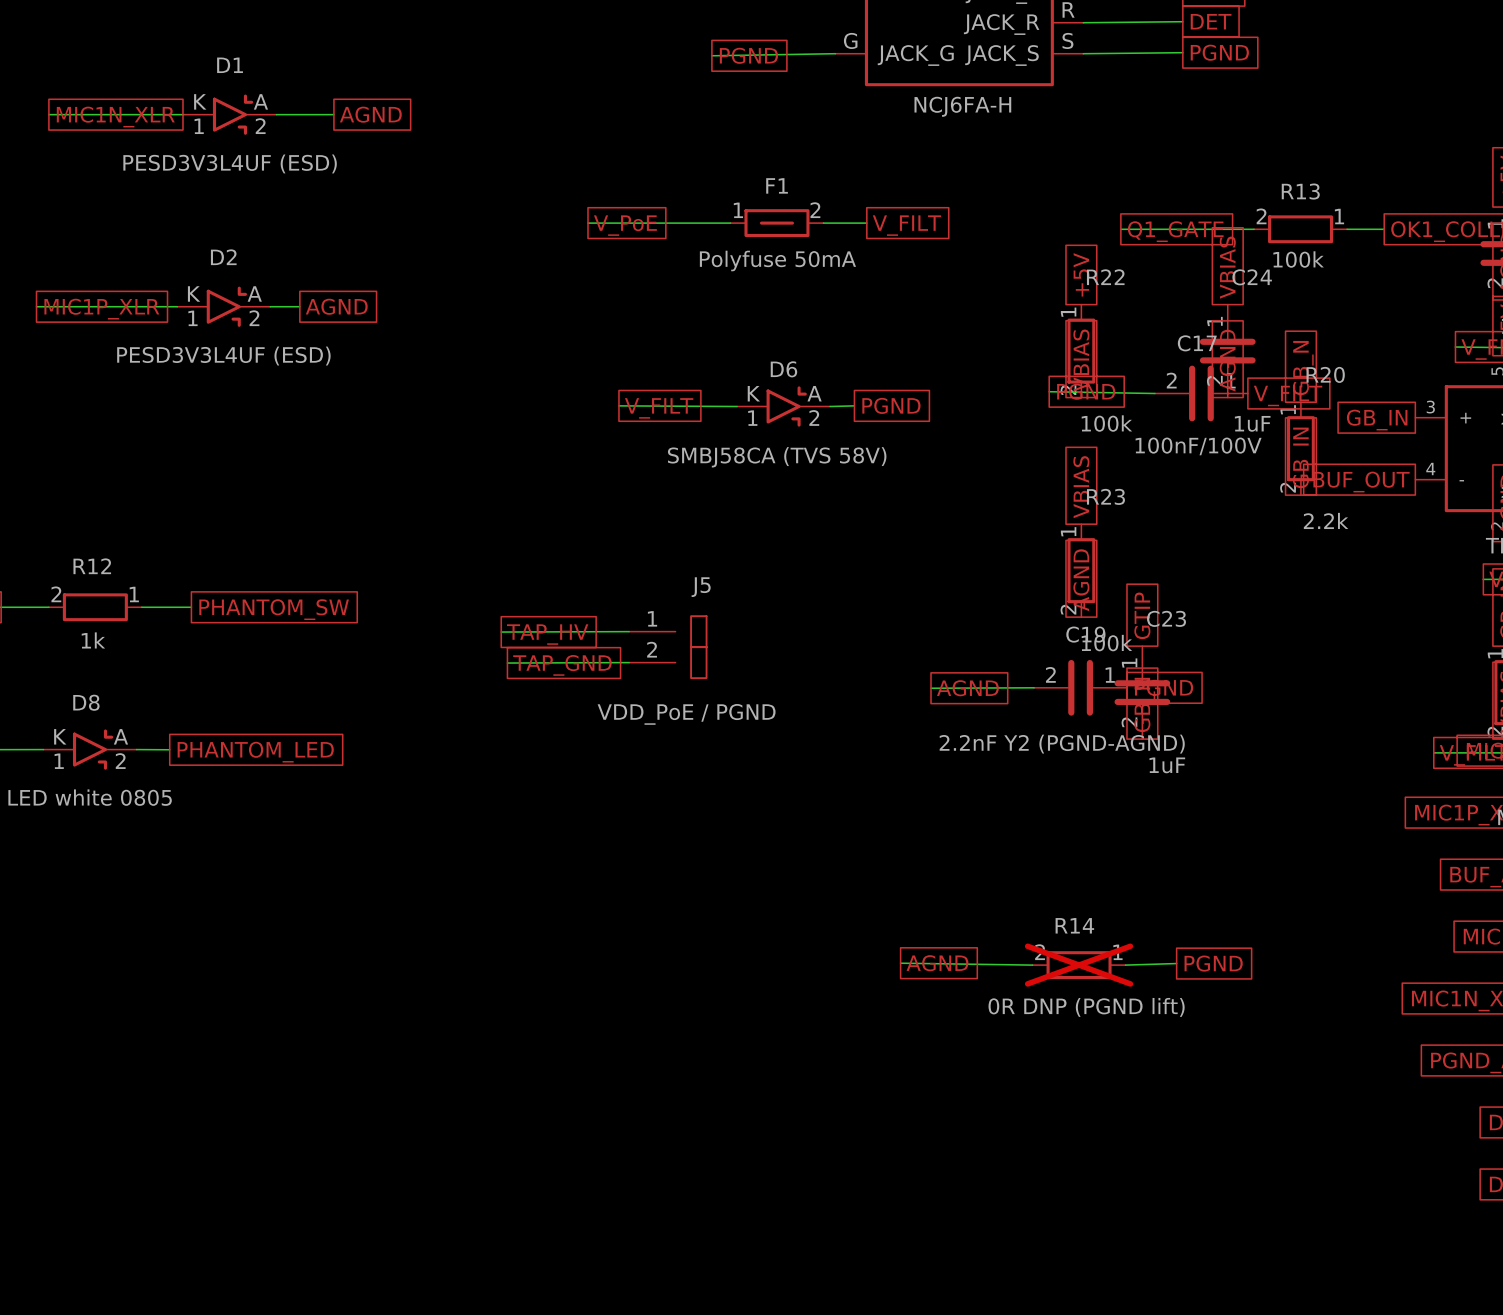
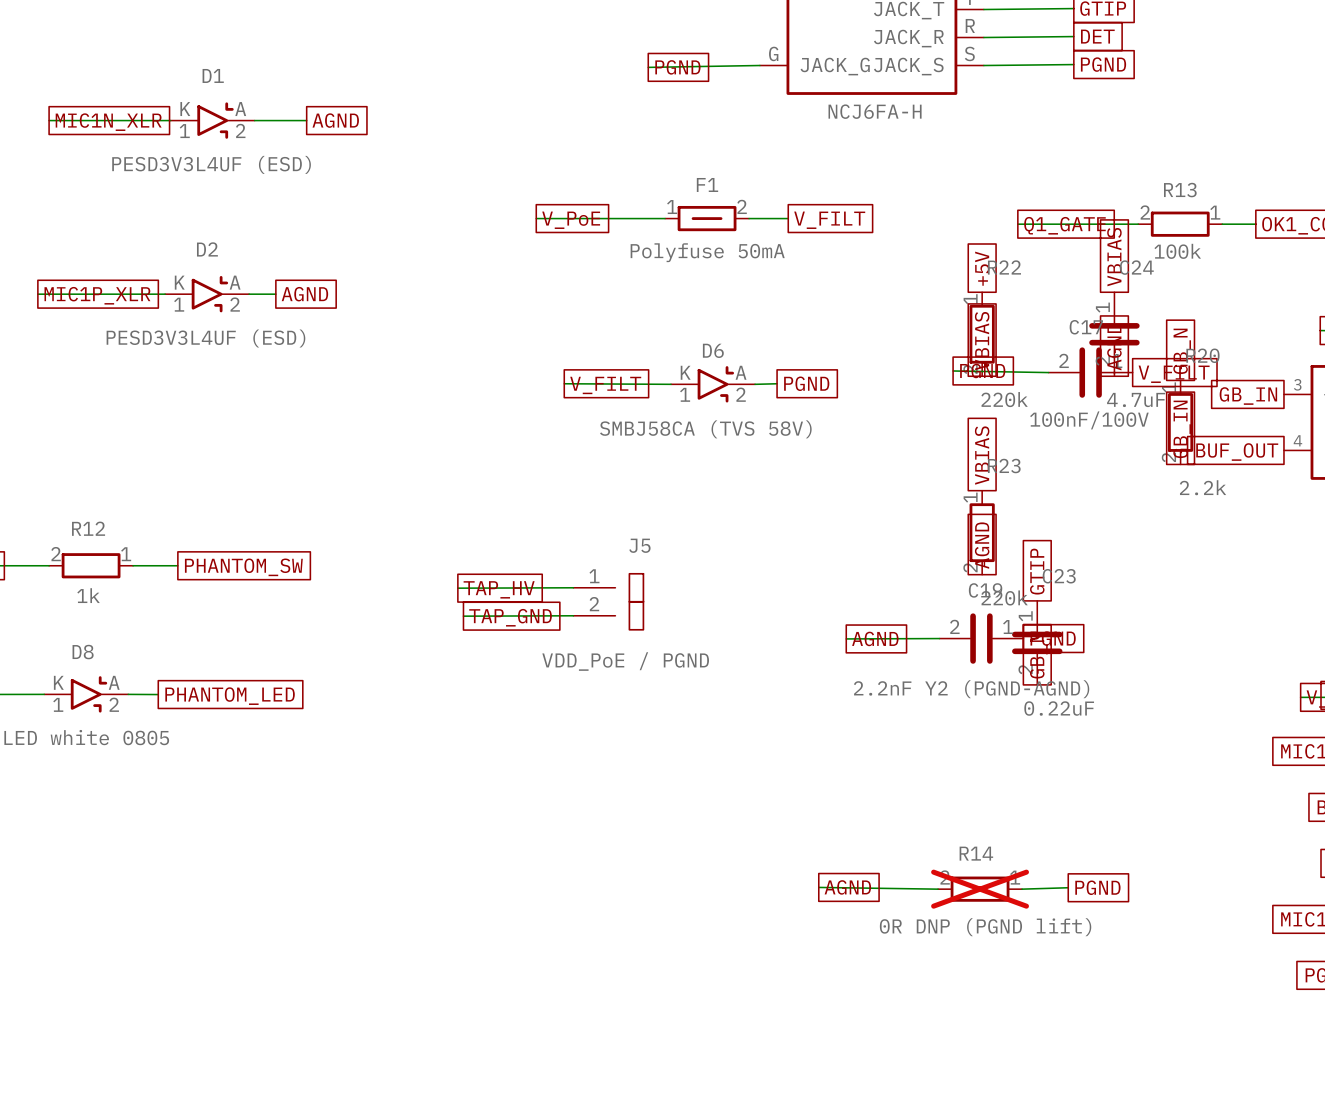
R22 value: 100k (1106, 423) -> 220k (1004, 399)
C24 value: 1uF (1252, 423) -> 4.7uF (1136, 399)
R23 value: 100k (1106, 643) -> 220k (1004, 597)
C23 value: 1uF (1167, 765) -> 0.22uF (1059, 708)

